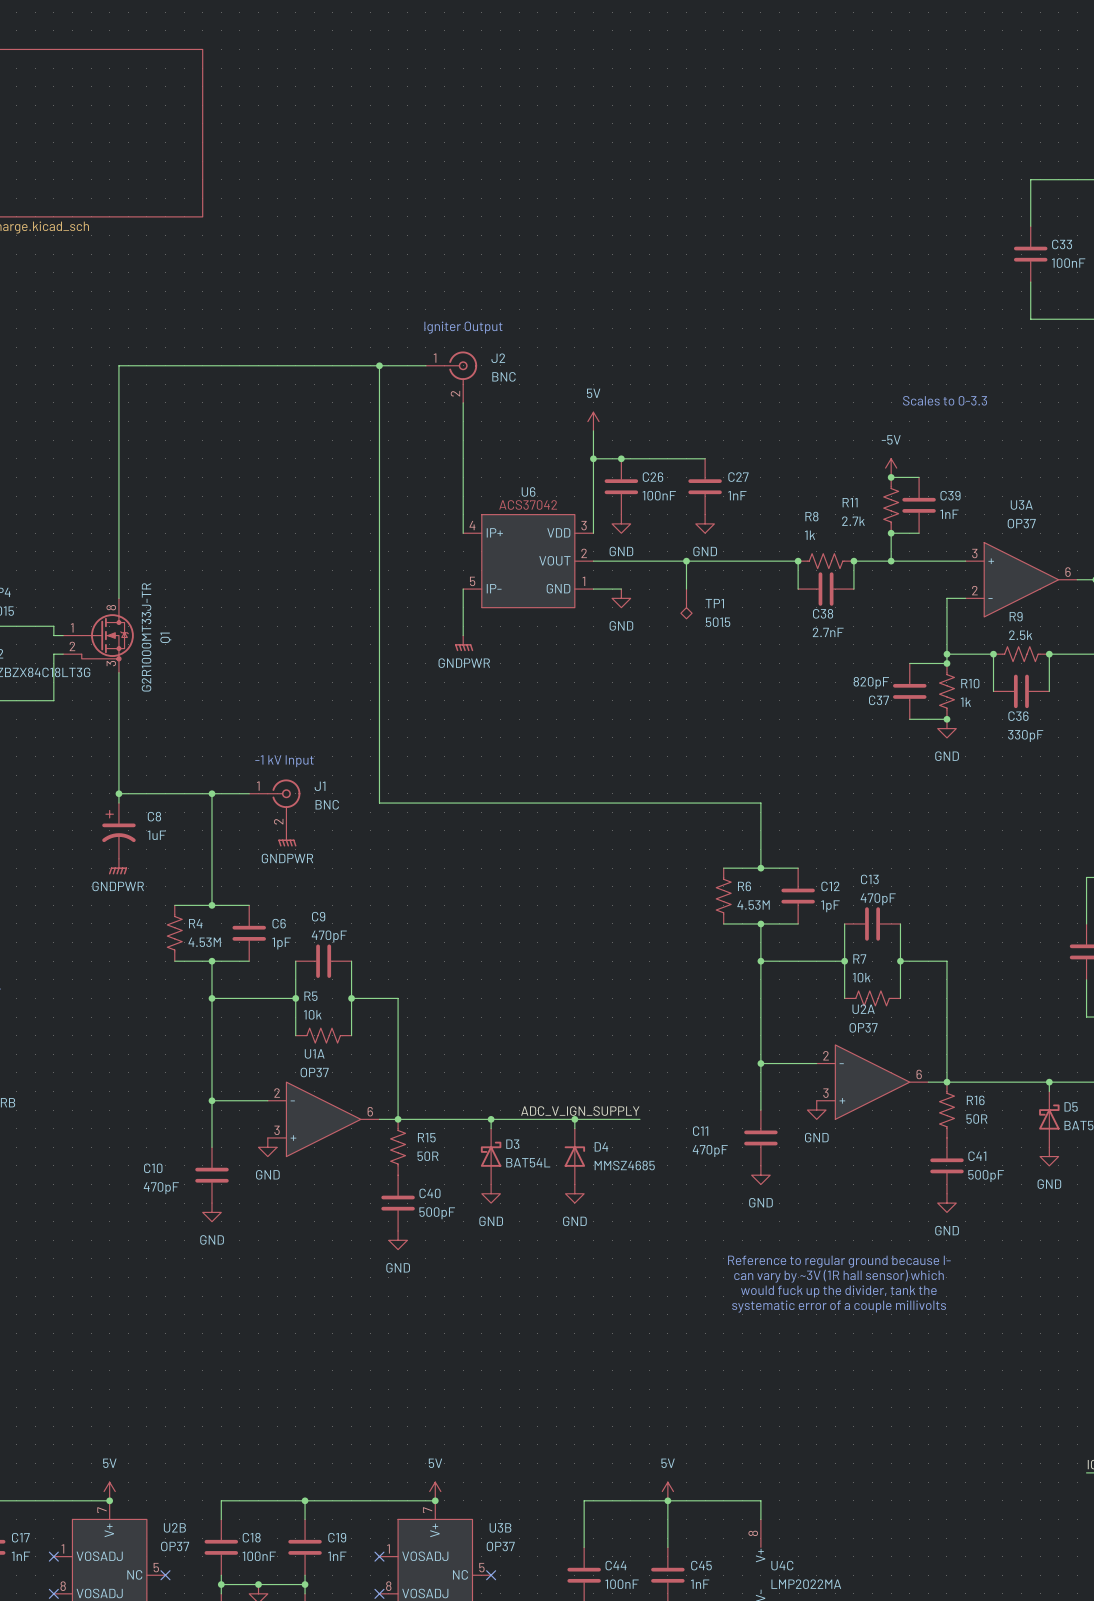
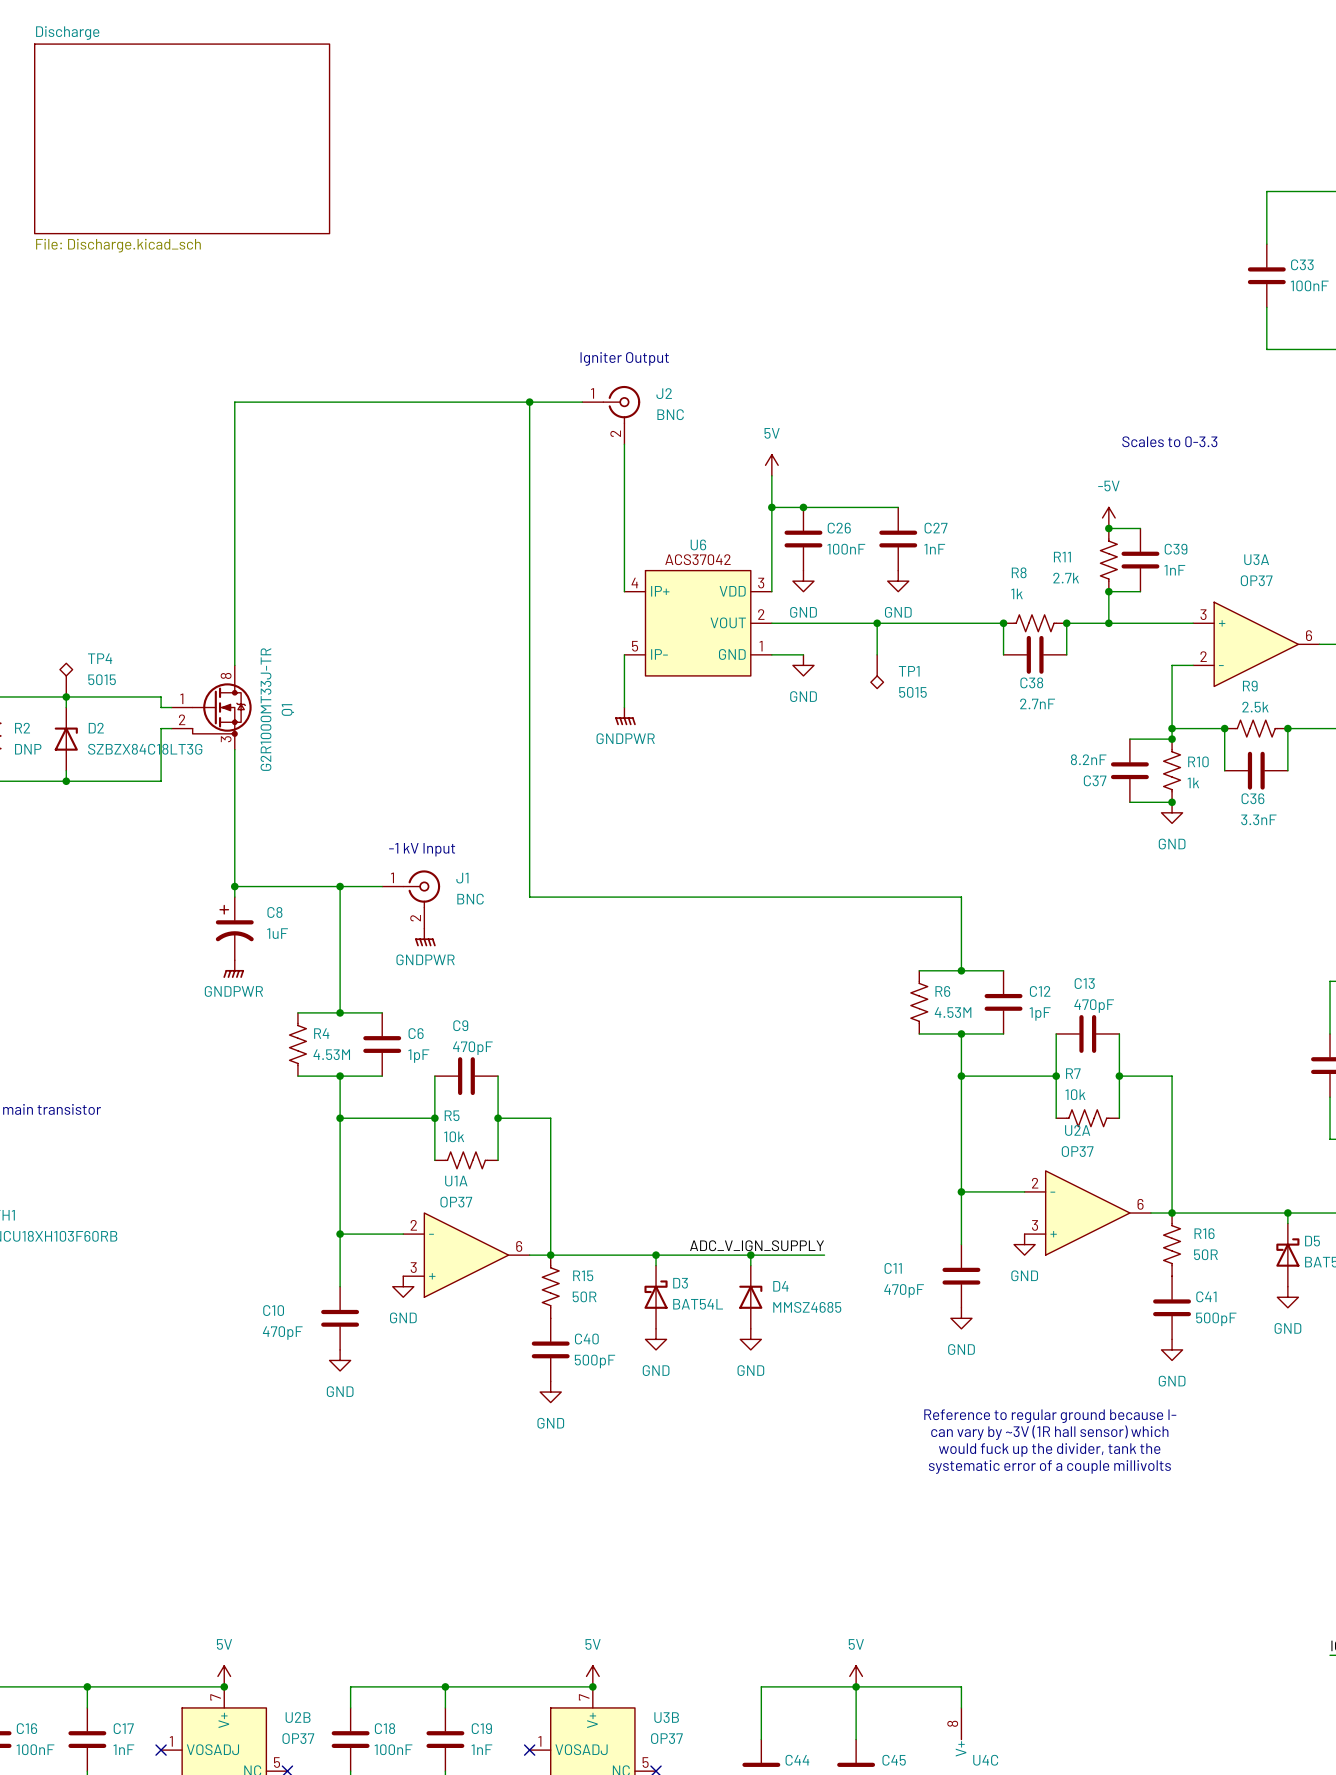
C37 value: 820pF (871, 682) -> 8.2nF (1088, 759)
C36 value: 330pF (1025, 736) -> 3.3nF (1258, 819)

